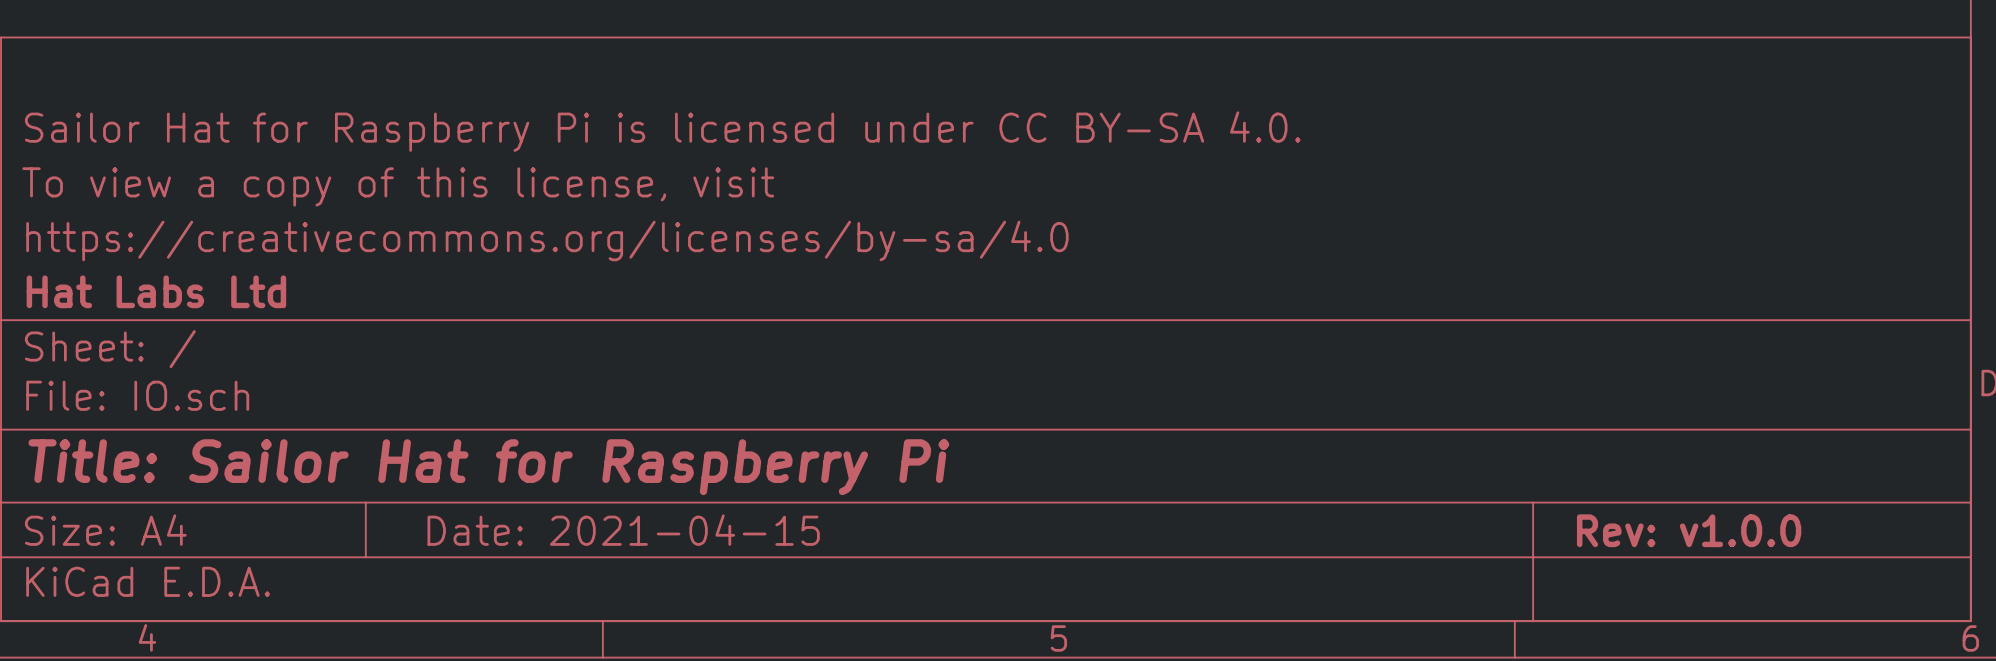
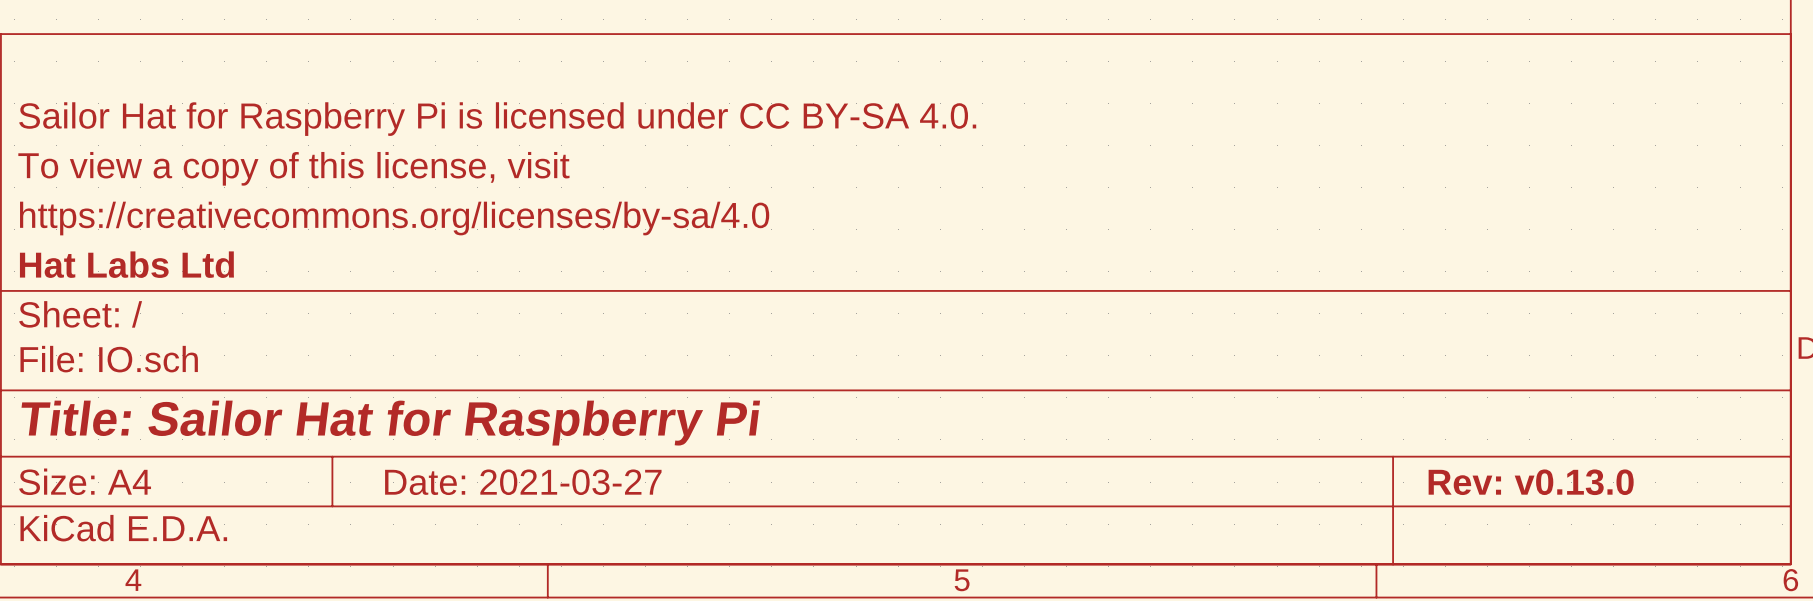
title block: Date: 2021-04-15 (623, 530) -> Date: 2021-03-27 (523, 482)
title block: Rev: v1.0.0 (1689, 530) -> Rev: v0.13.0 (1531, 482)

